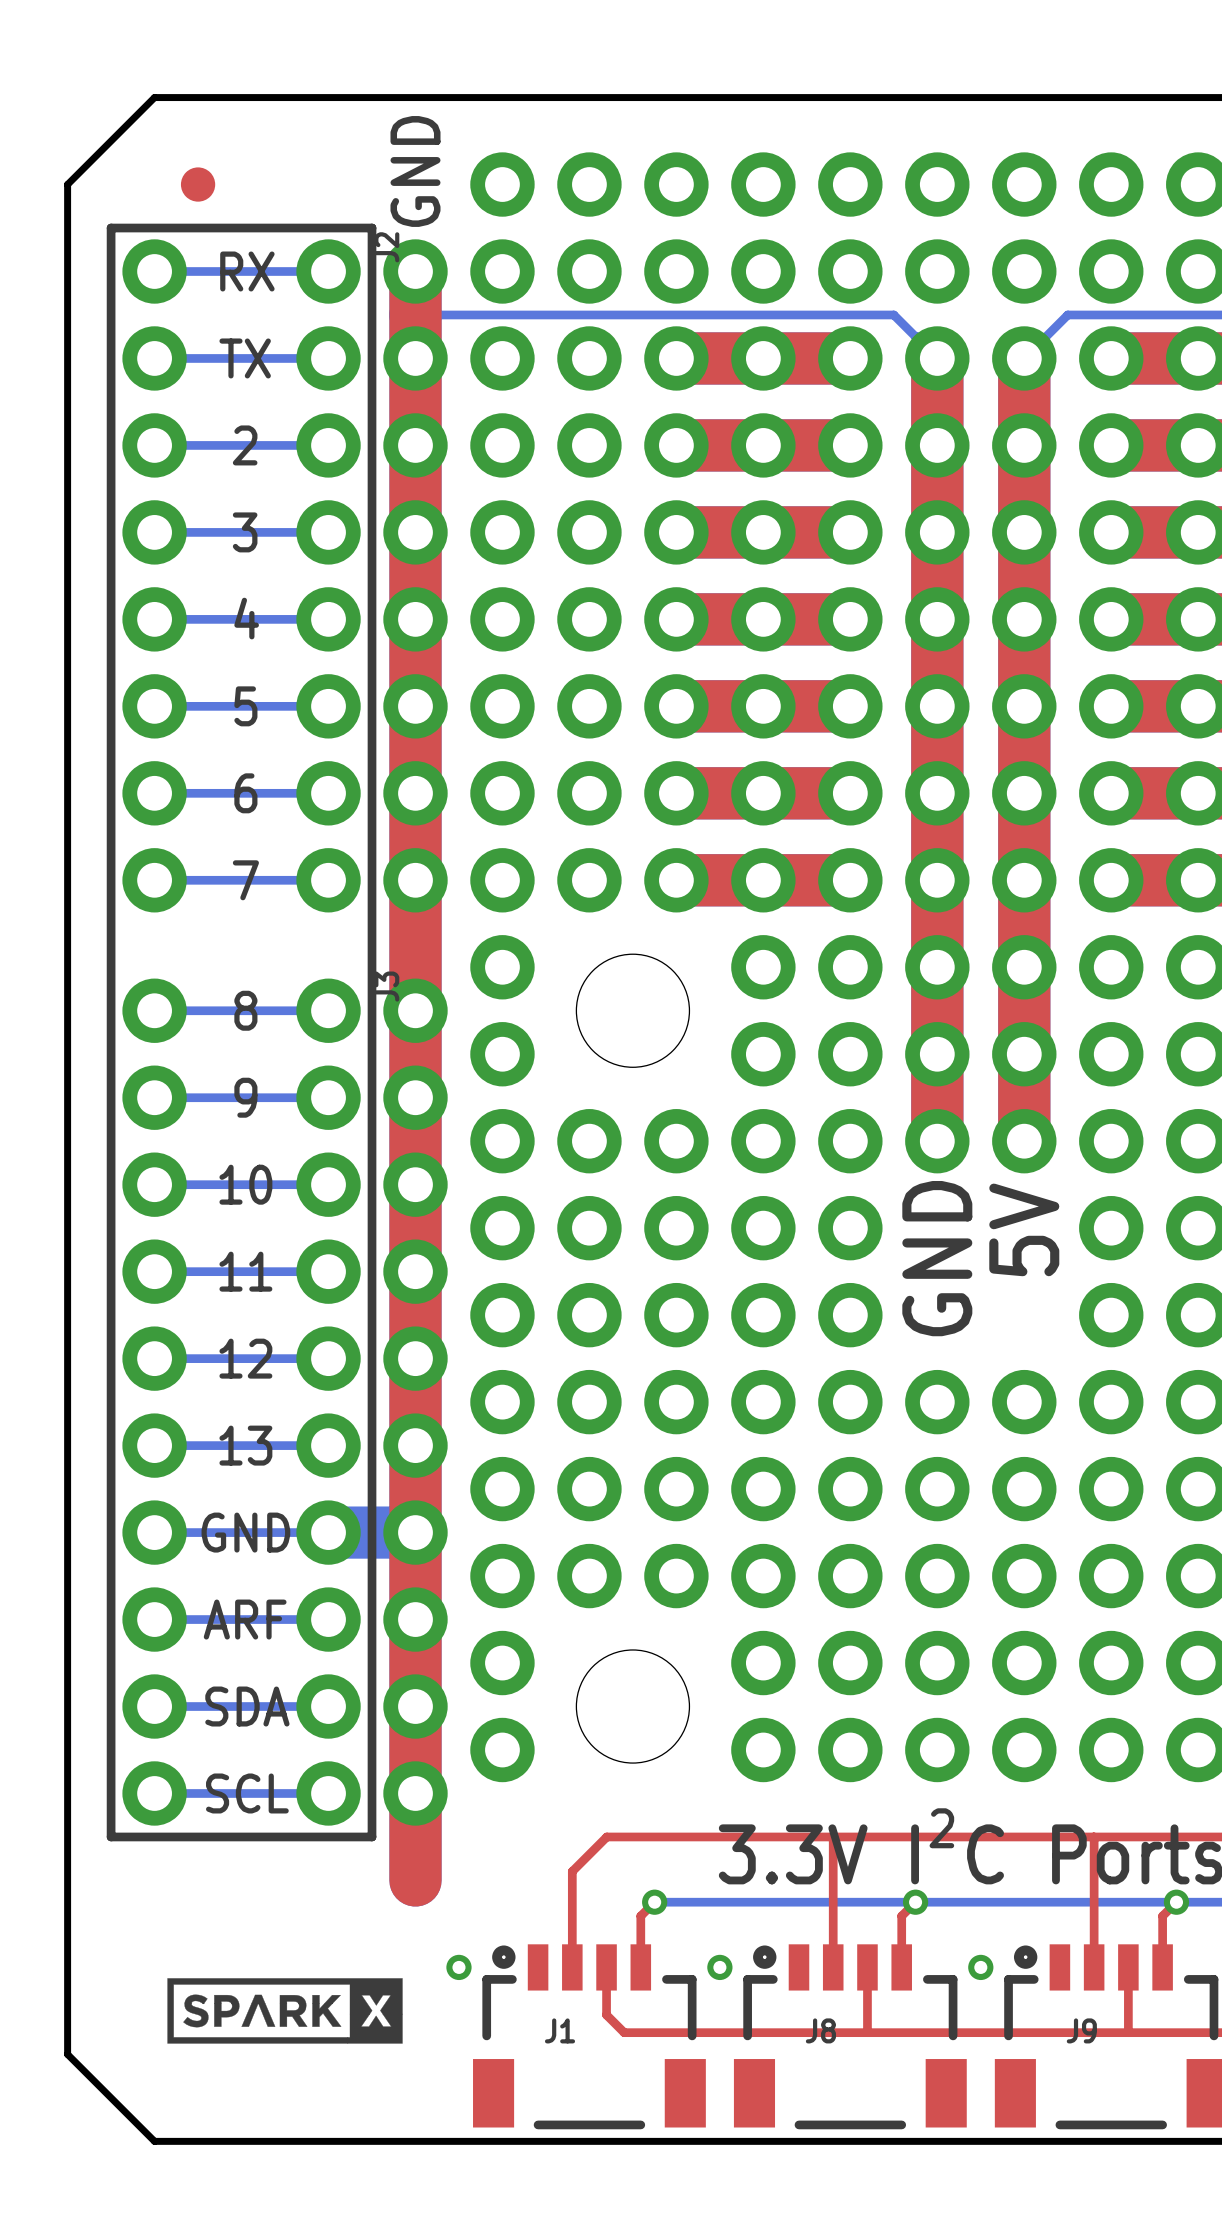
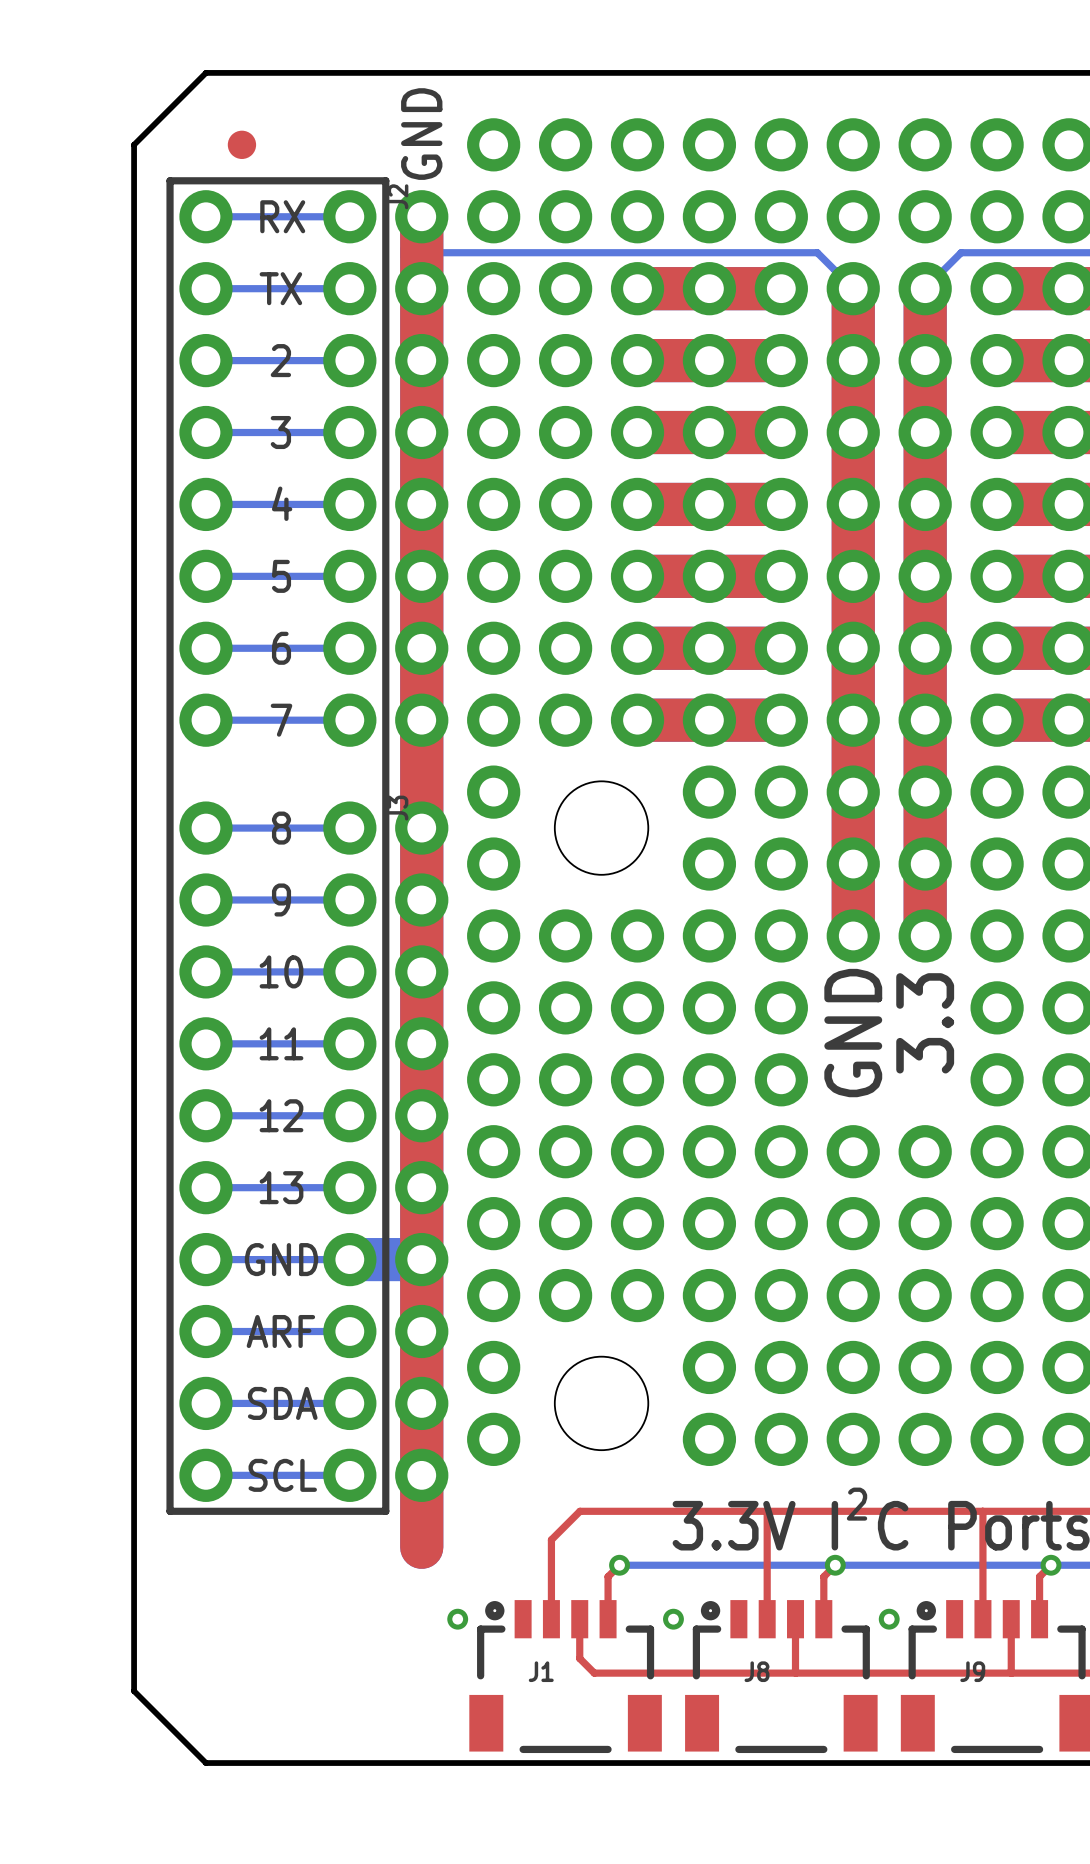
text: 5V (1024, 1229) -> 3.3 (925, 1023)
drawing: [167, 1978, 403, 2044] -> none

